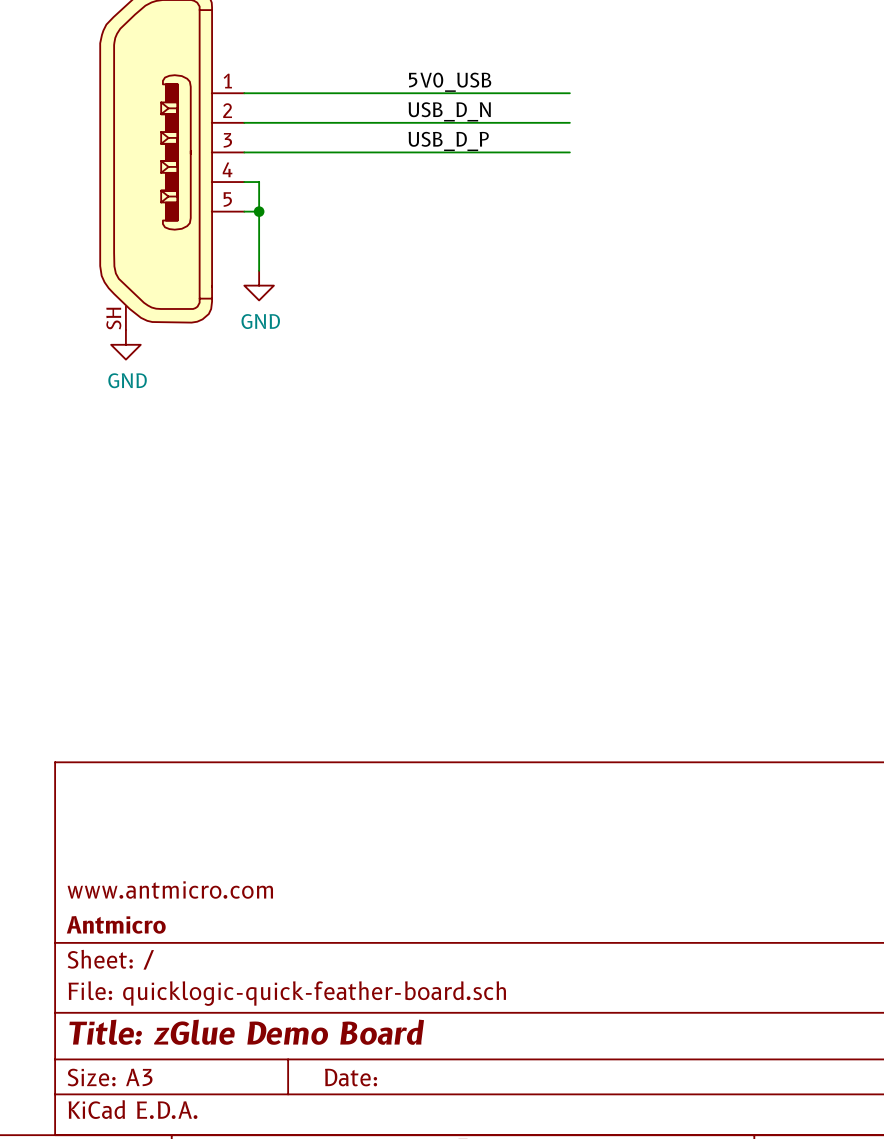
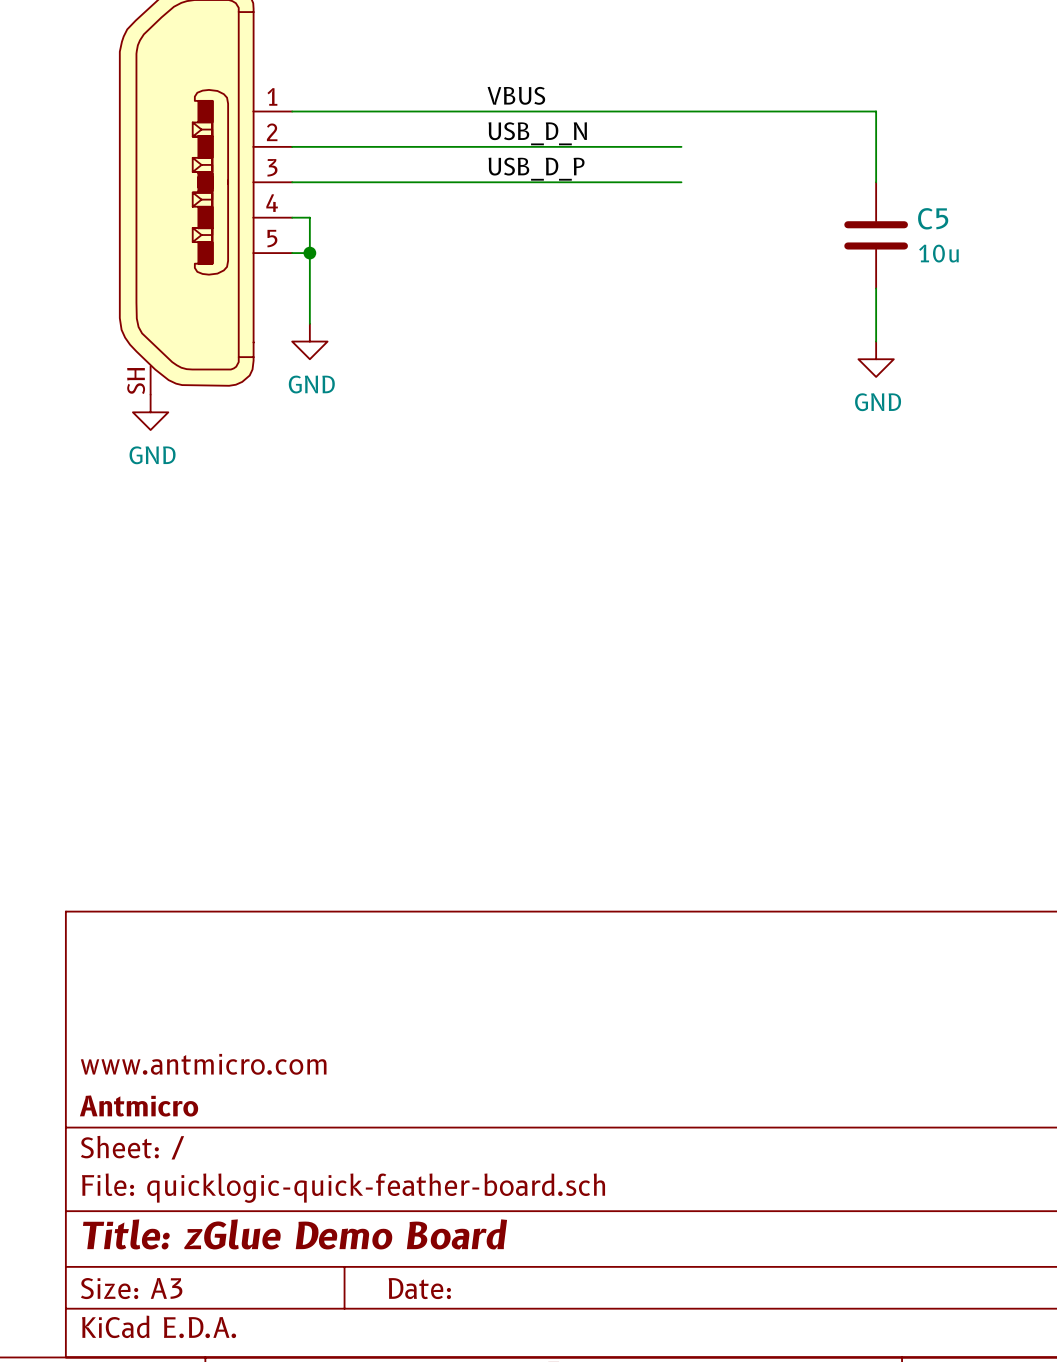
label: 5V0_USB (450, 82) -> VBUS (516, 95)
wire: none -> (681, 111) (876, 111) (876, 182)
C5: none -> (876, 235)
wire: none -> (876, 288) (876, 341)
power symbol: none -> GND (876, 359)

